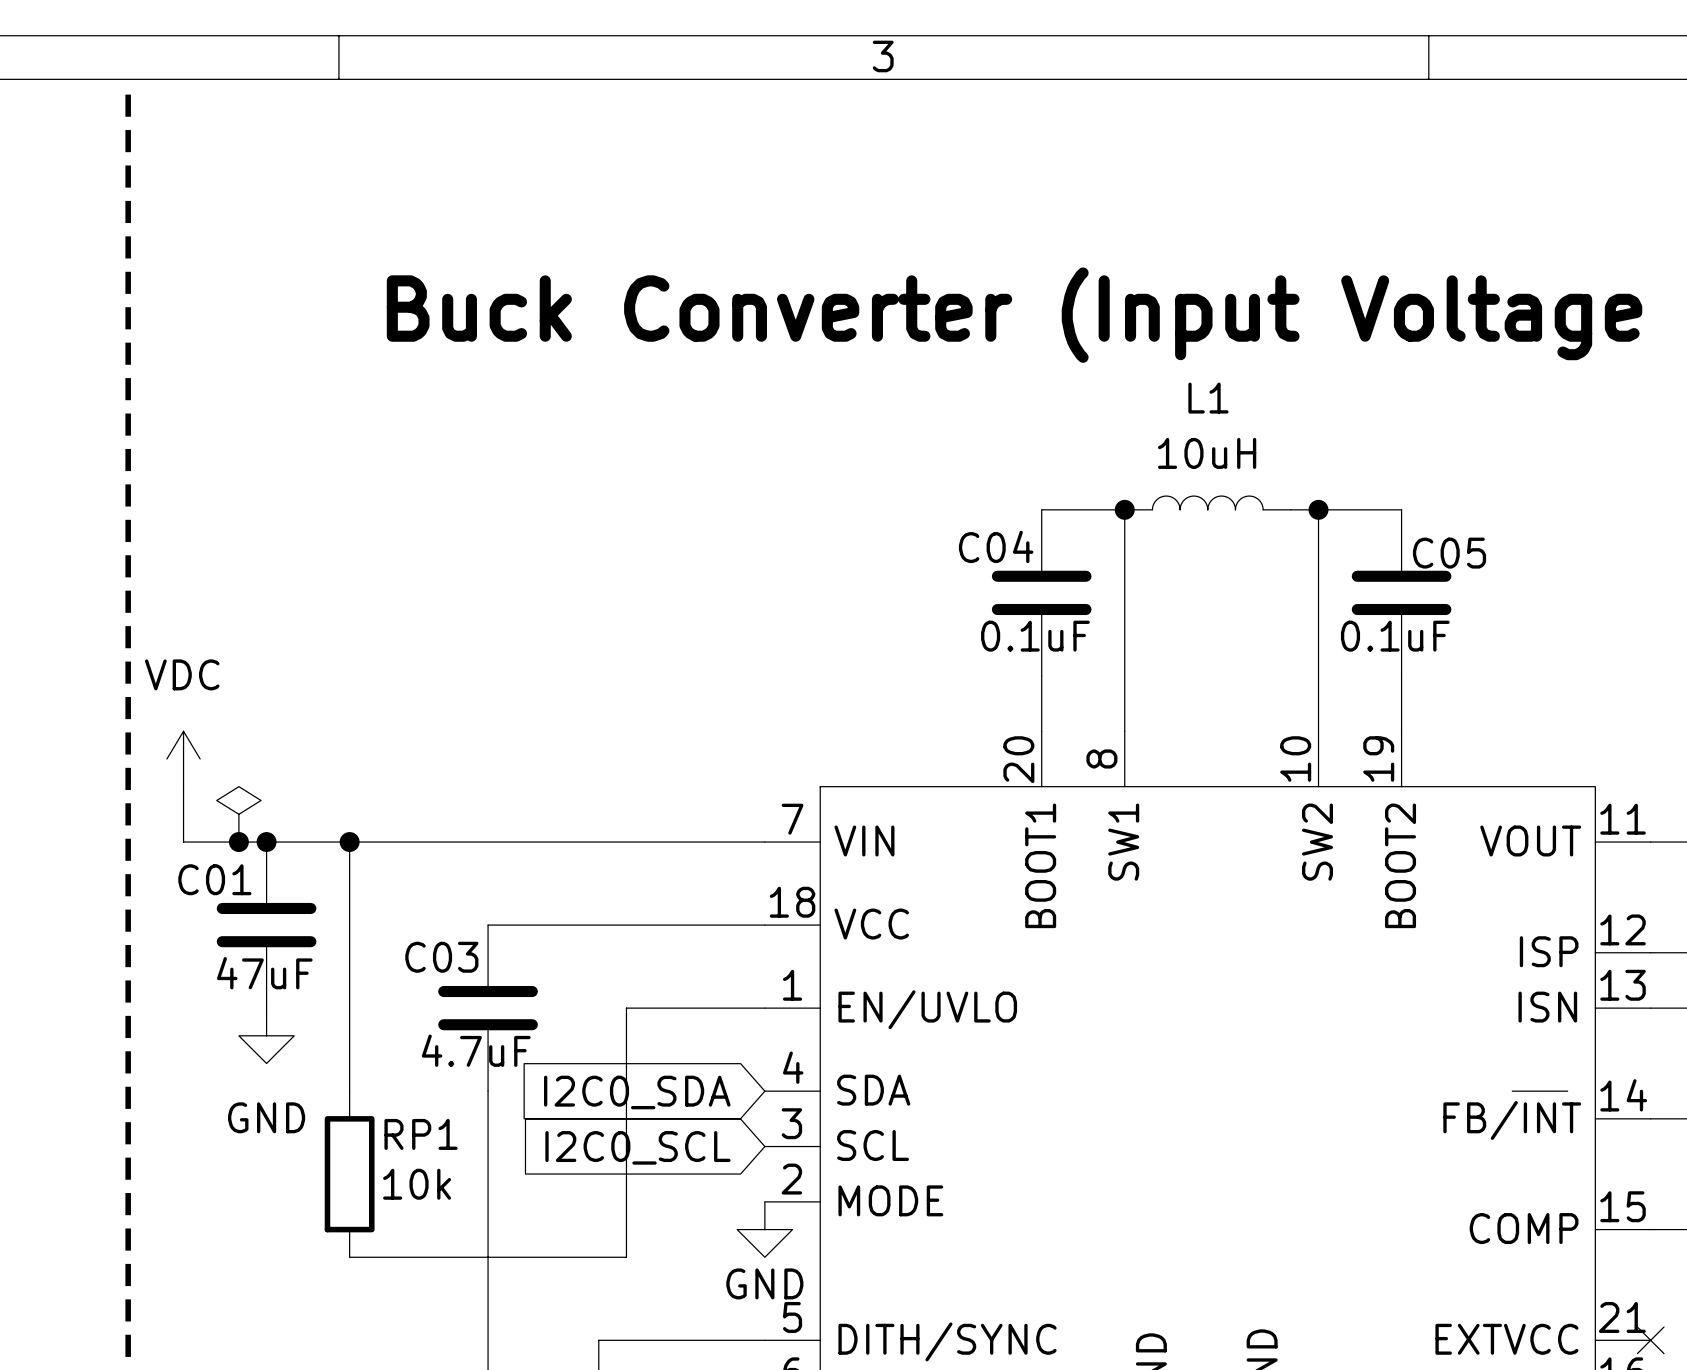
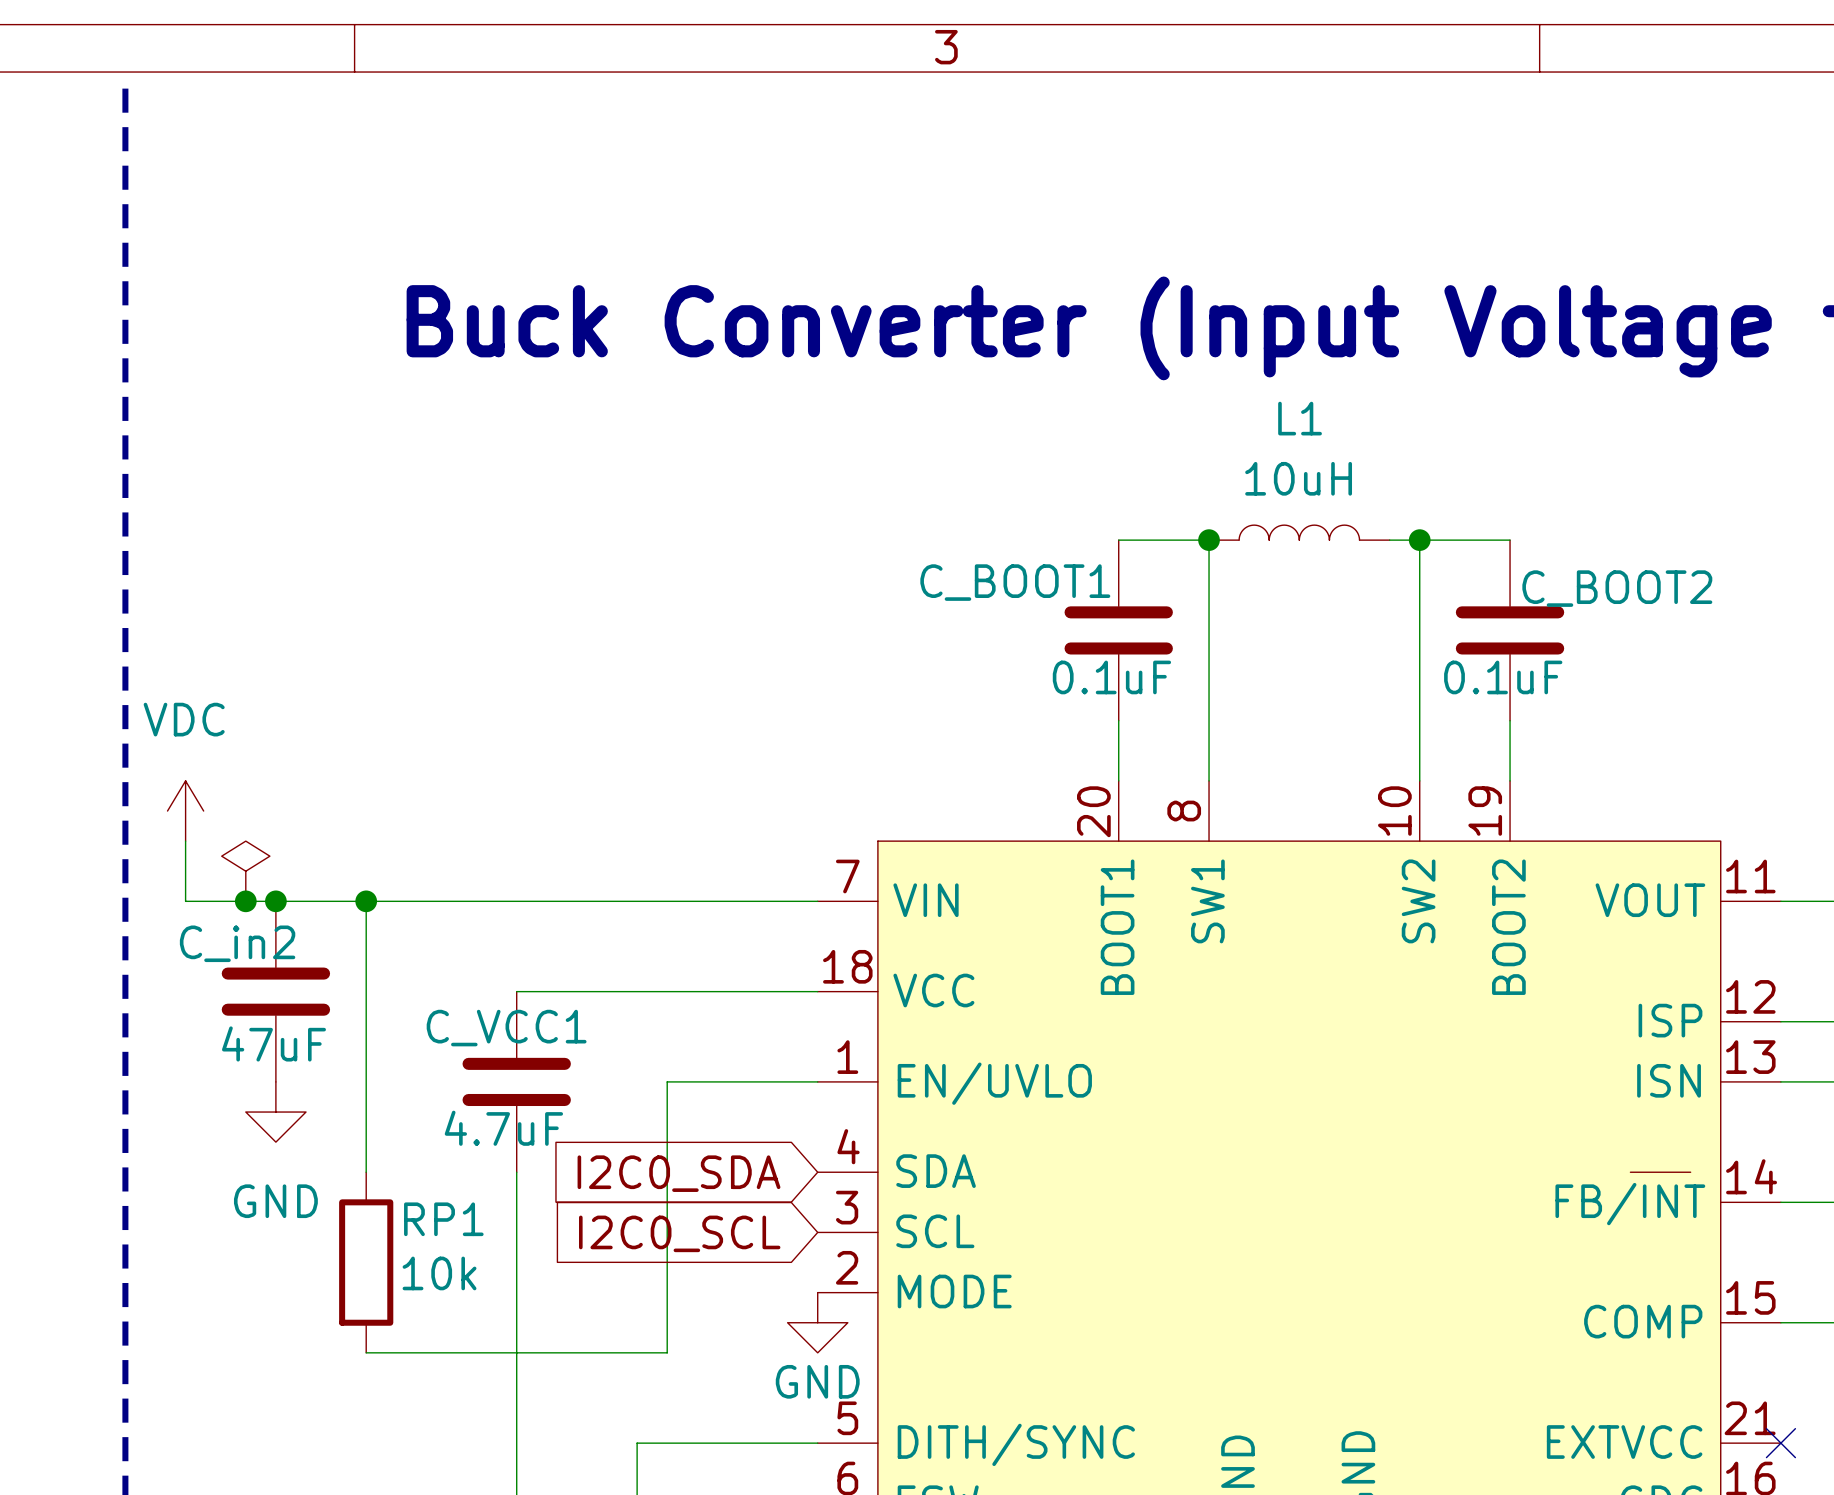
C04 name: C04 (996, 546) -> C_BOOT1 (1015, 582)
C05 name: C05 (1449, 553) -> C_BOOT2 (1617, 588)
C01 name: C01 (214, 879) -> C_in2 (237, 943)
C03 name: C03 (441, 957) -> C_VCC1 (506, 1028)

